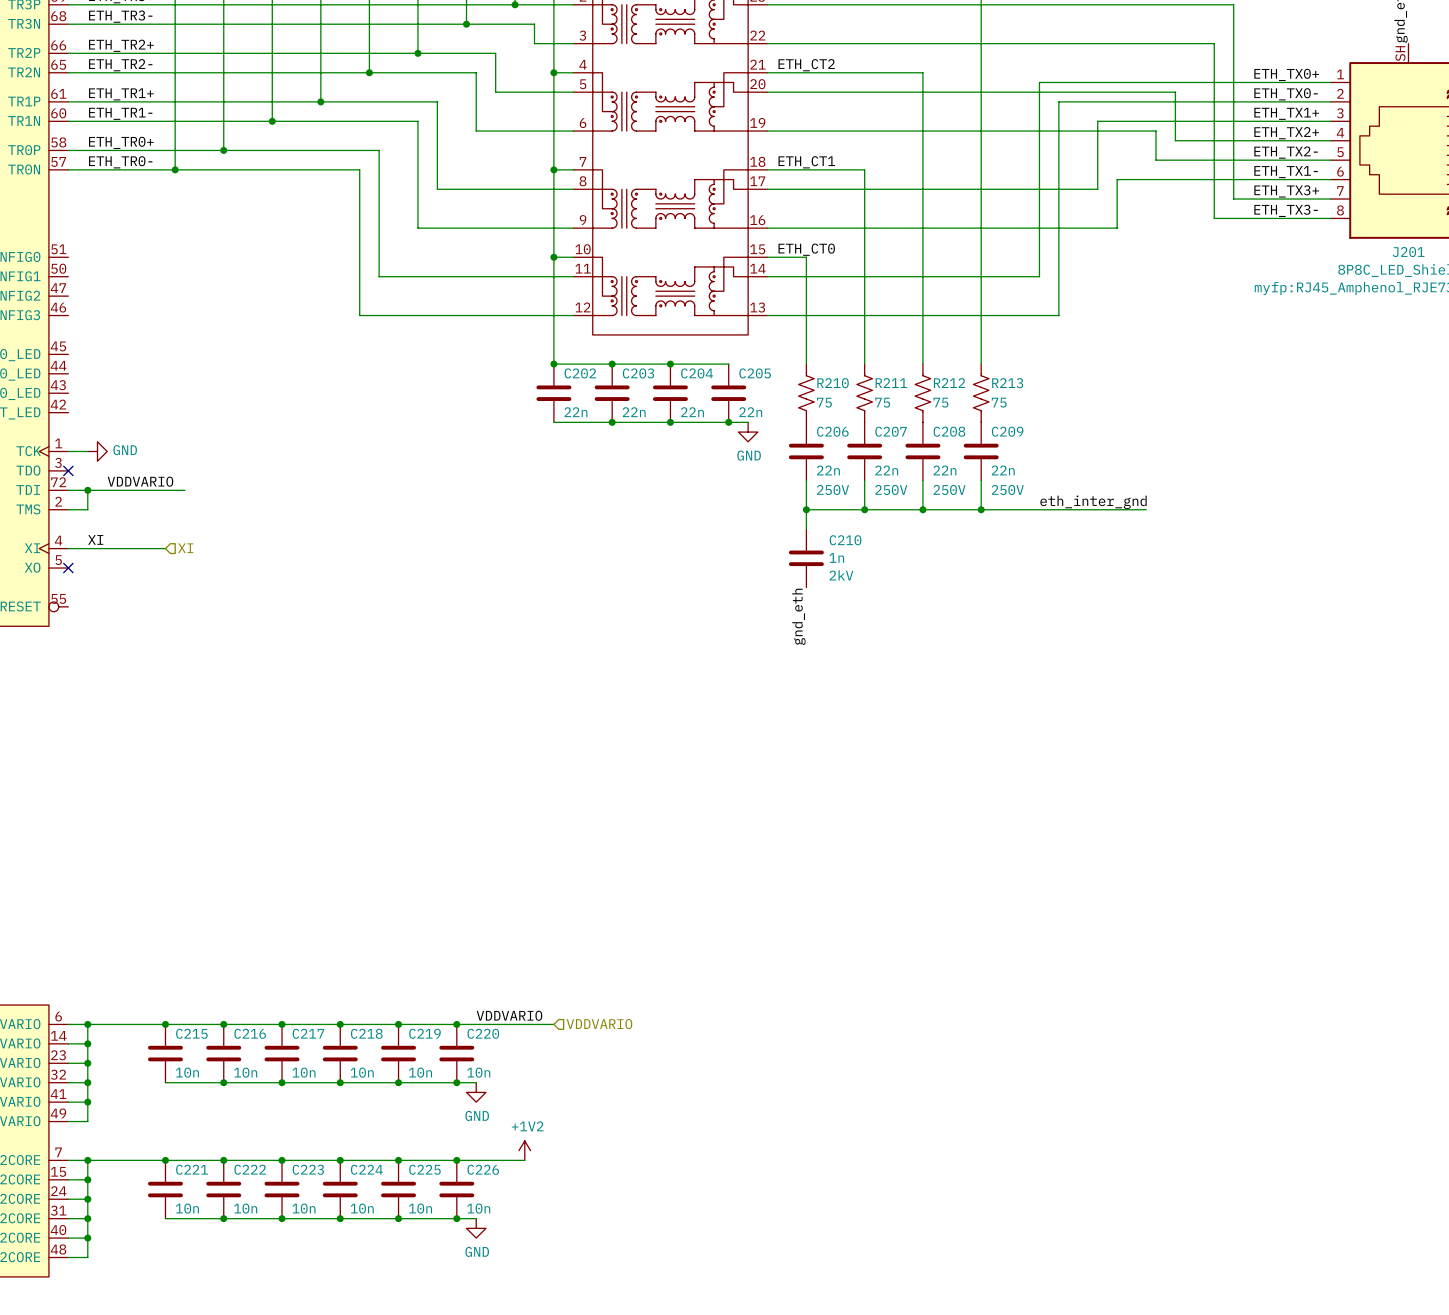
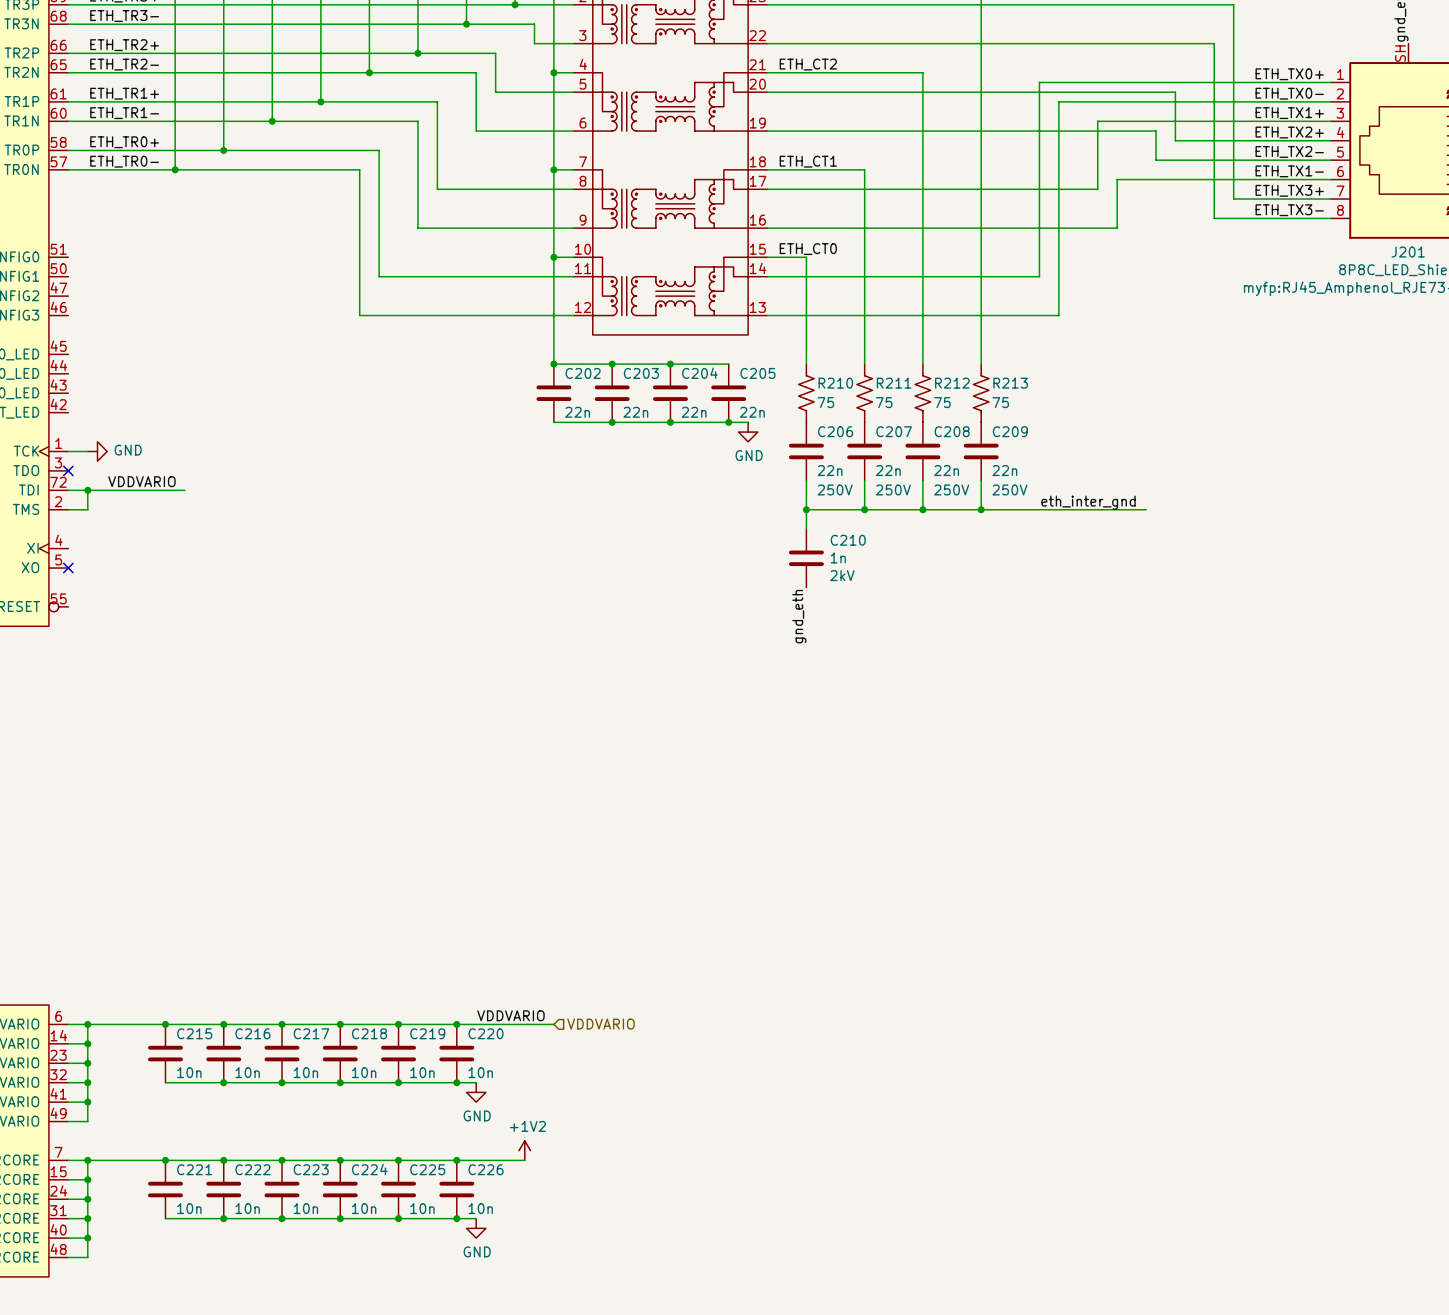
label: XI (95, 539) -> none
wire: (68, 548) (165, 548) -> none
hierarchical label: XI (185, 548) -> none

